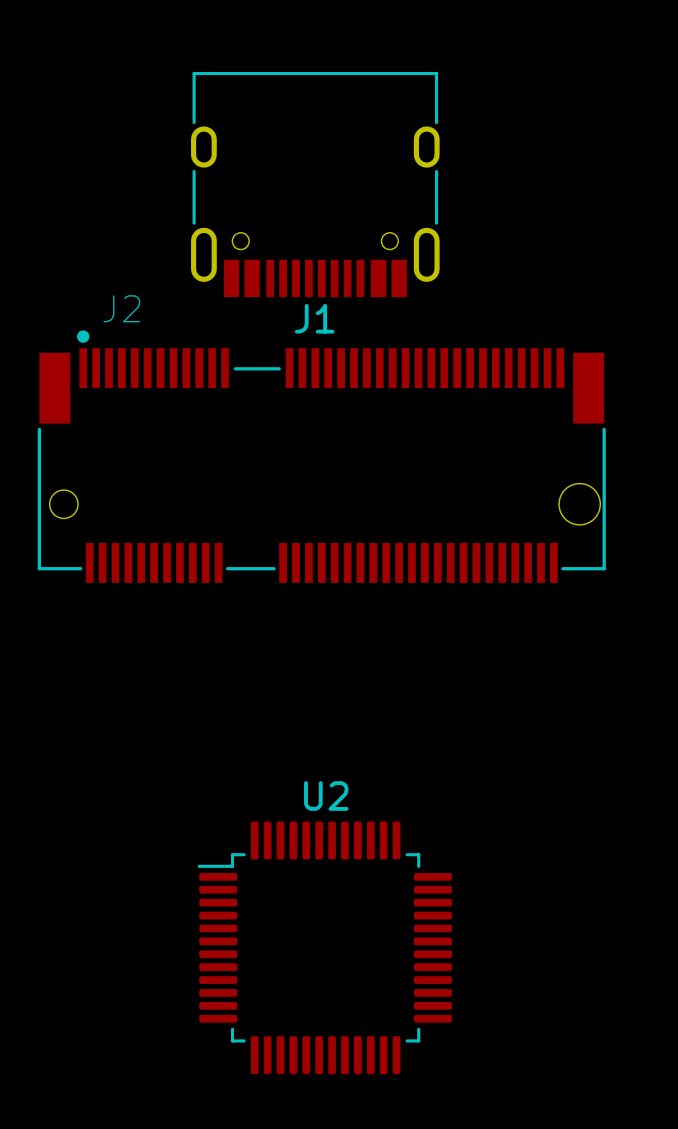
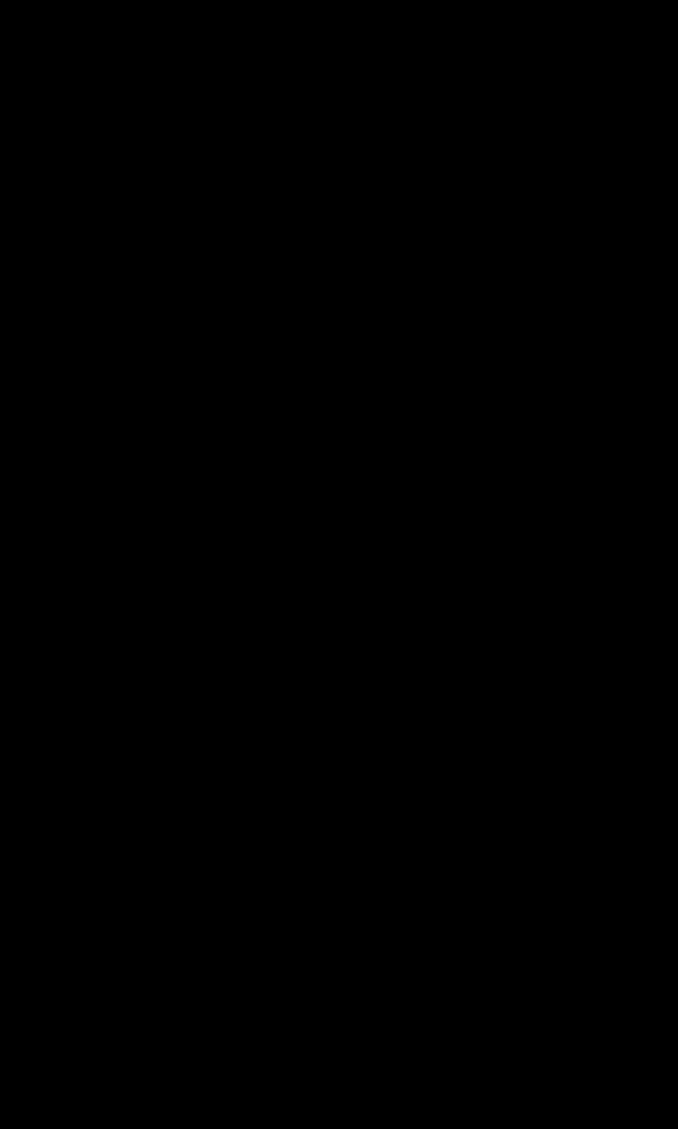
J1: (315, 184) -> none
J2: (321, 456) -> none
U2: (324, 947) -> none

